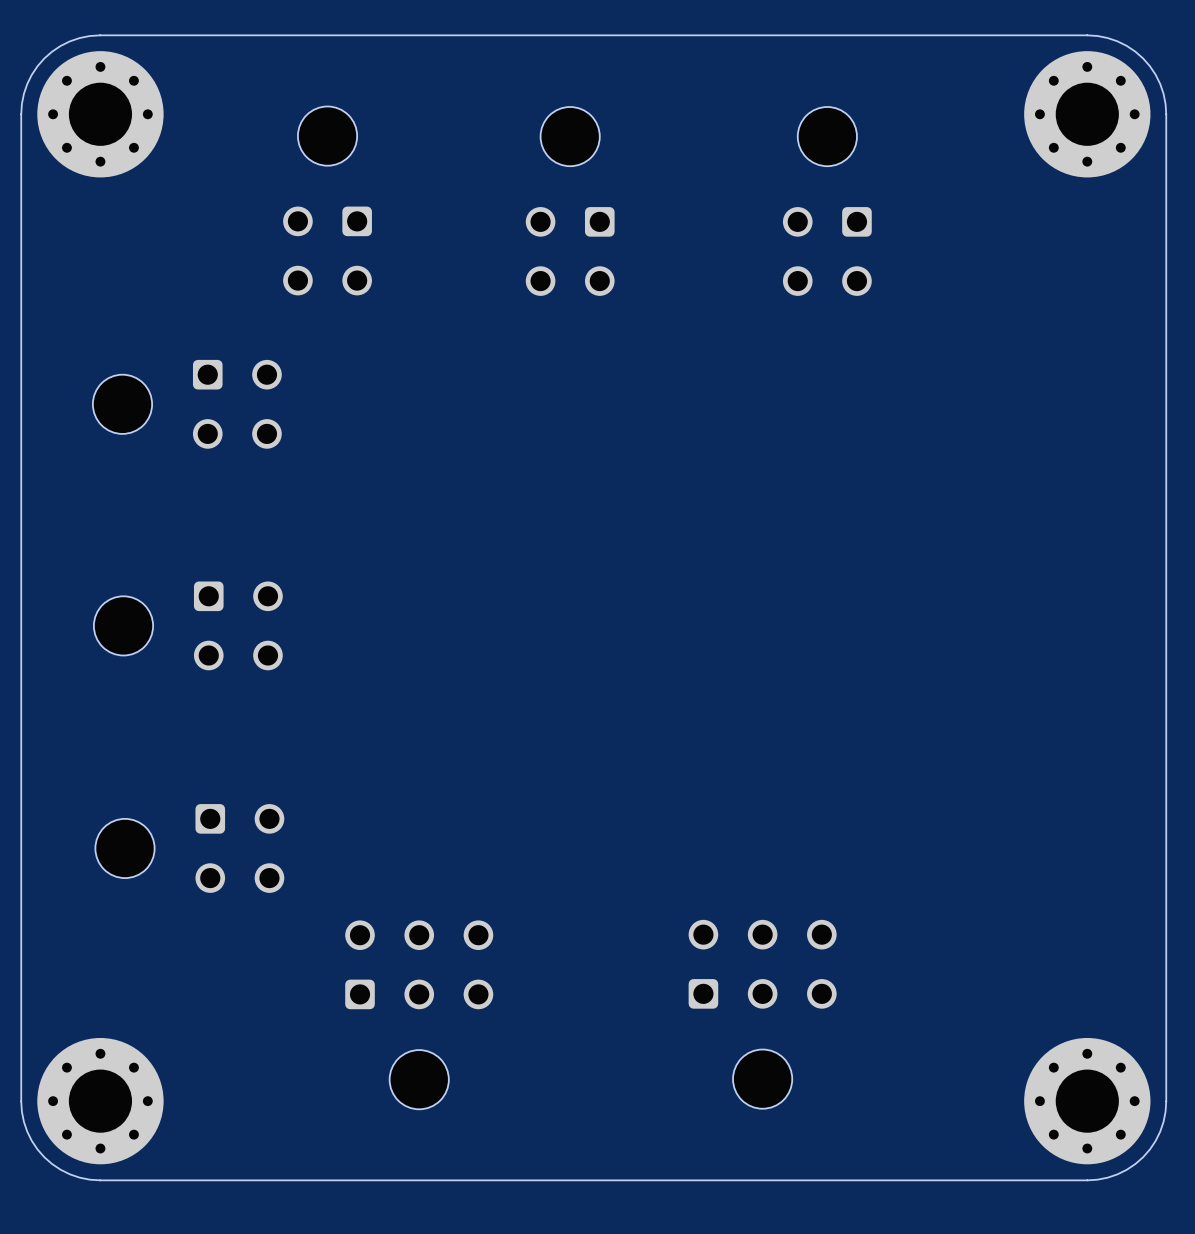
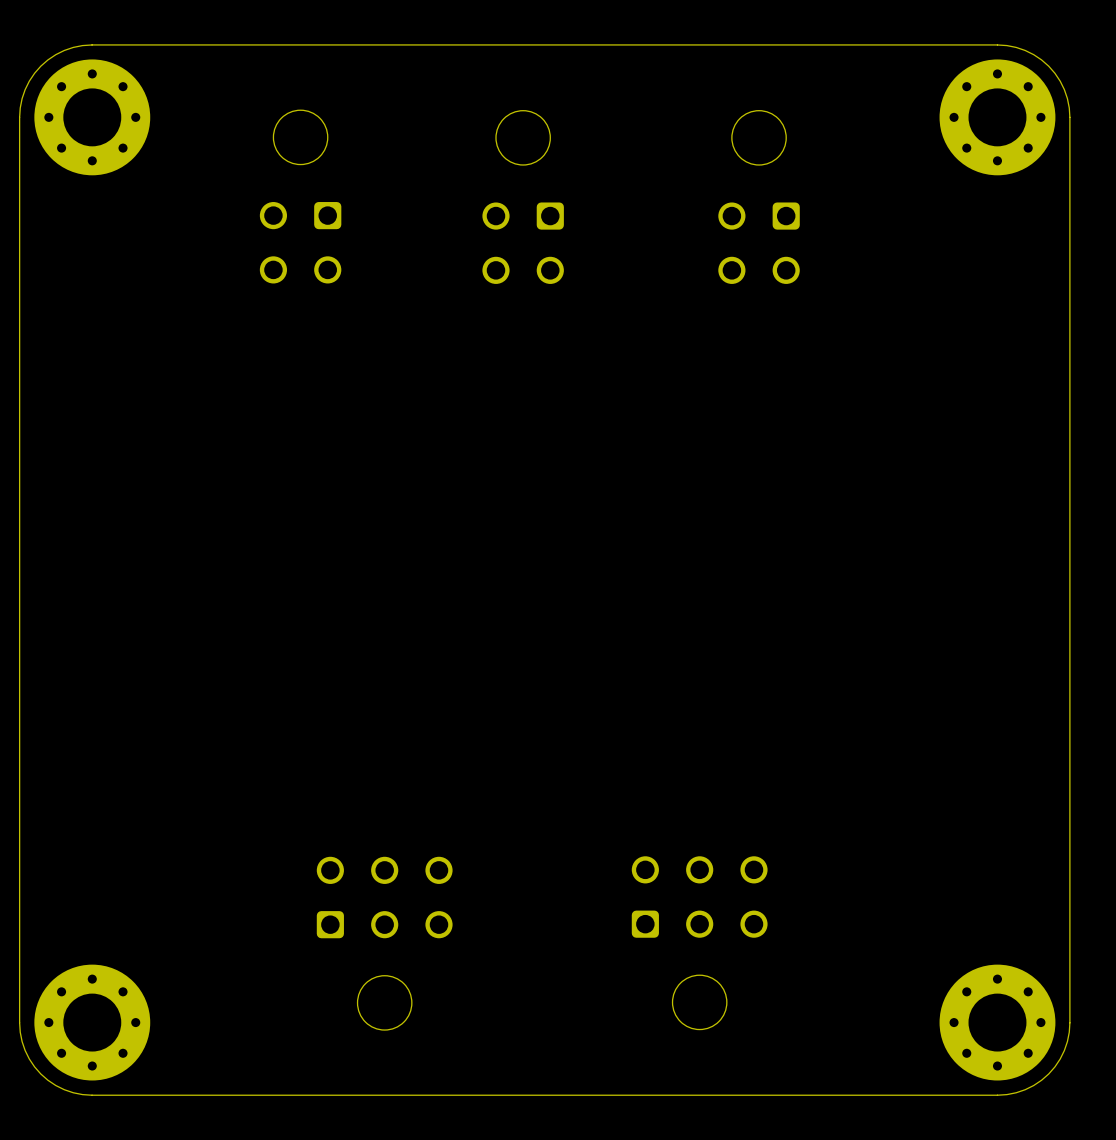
part: (187, 404) -> none
part: (188, 625) -> none
part: (189, 848) -> none

